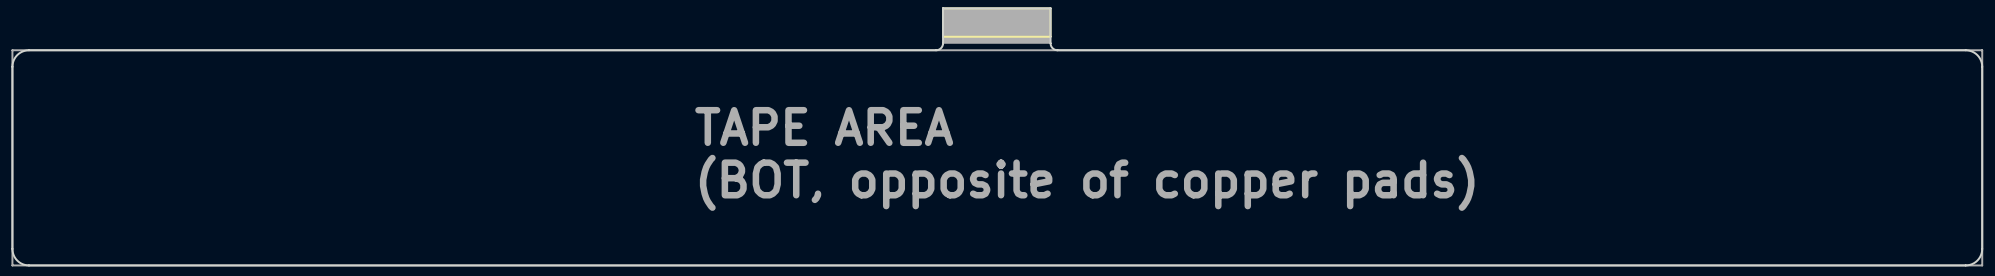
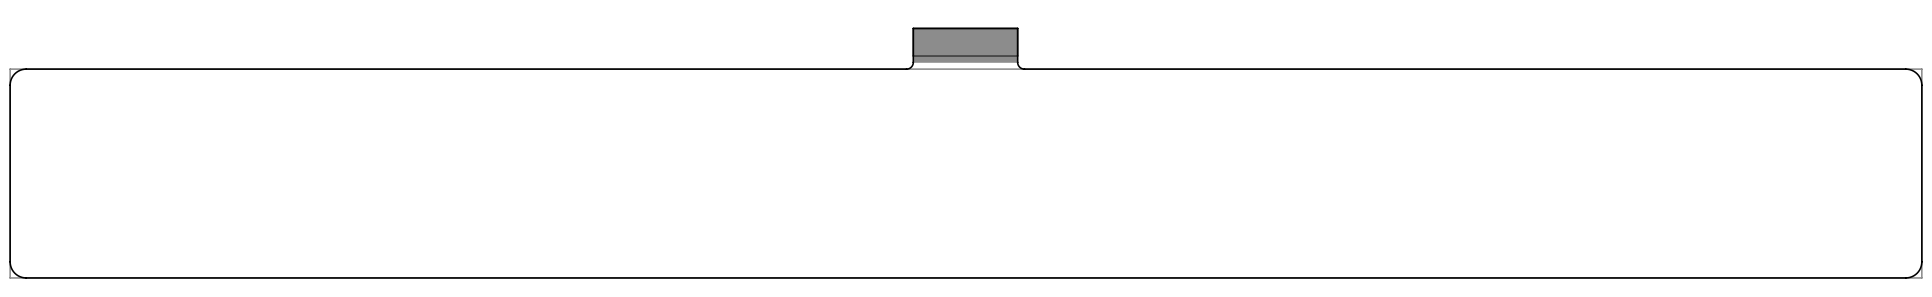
text: TAPE AREA (824, 126) -> none
text: (BOT, opposite of copper pads) (1087, 182) -> none

